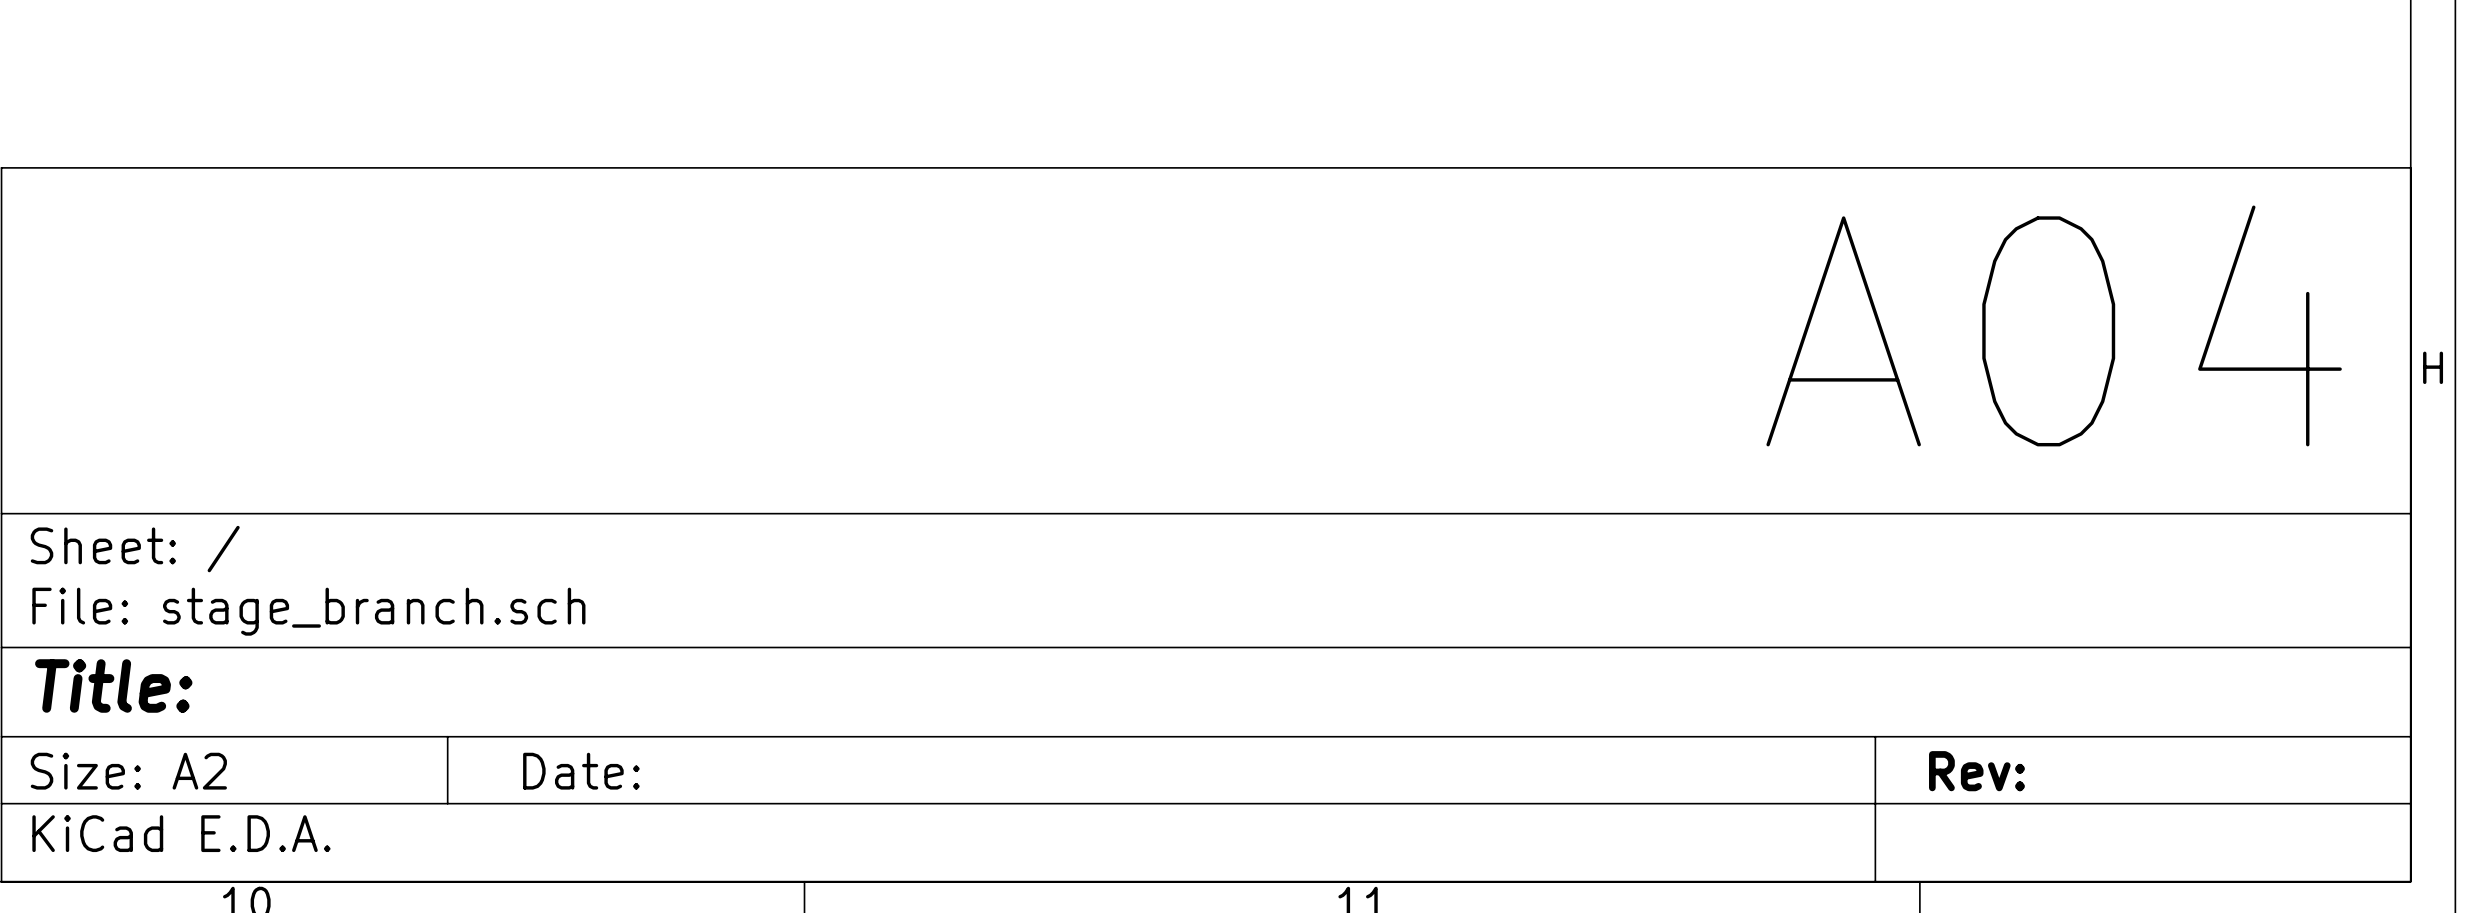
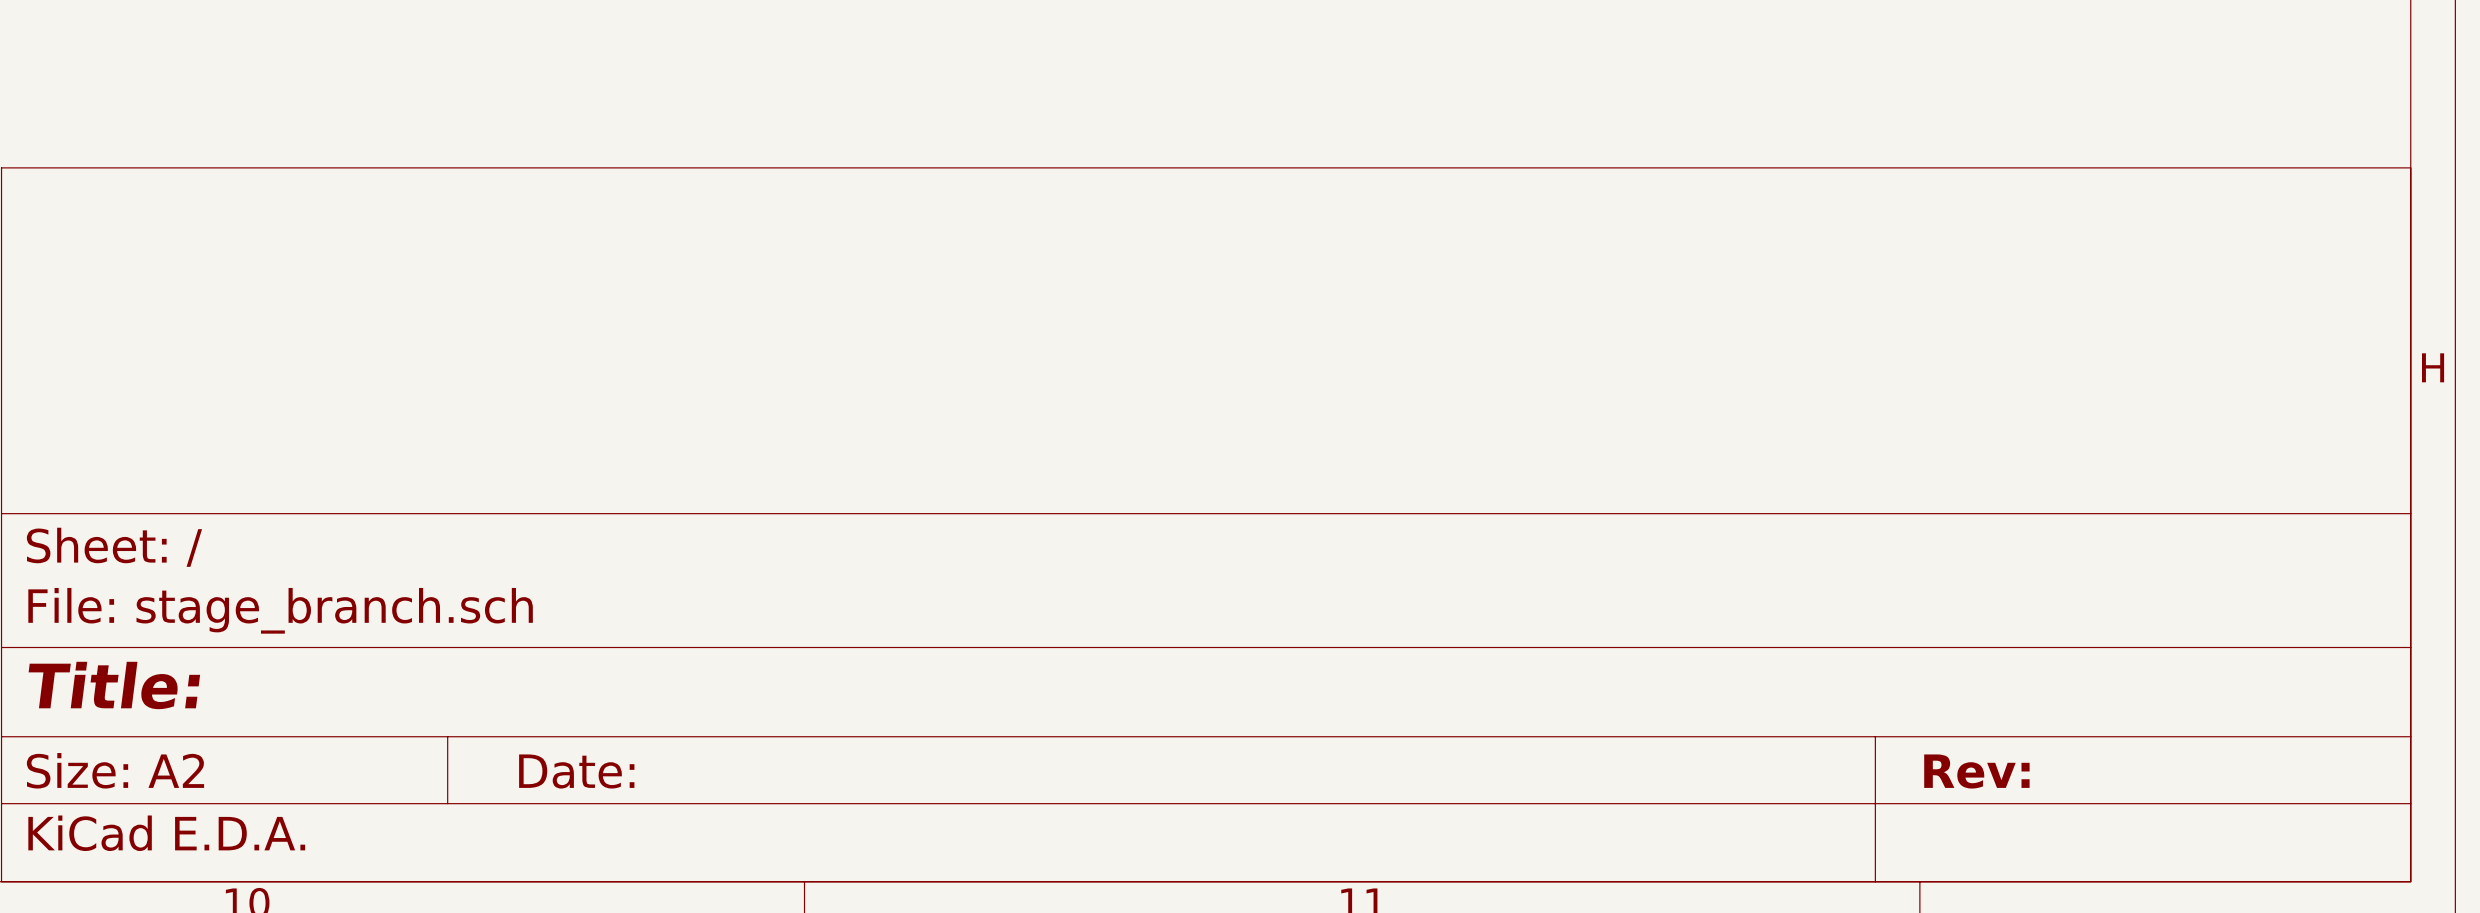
text: A04 (2054, 325) -> none

